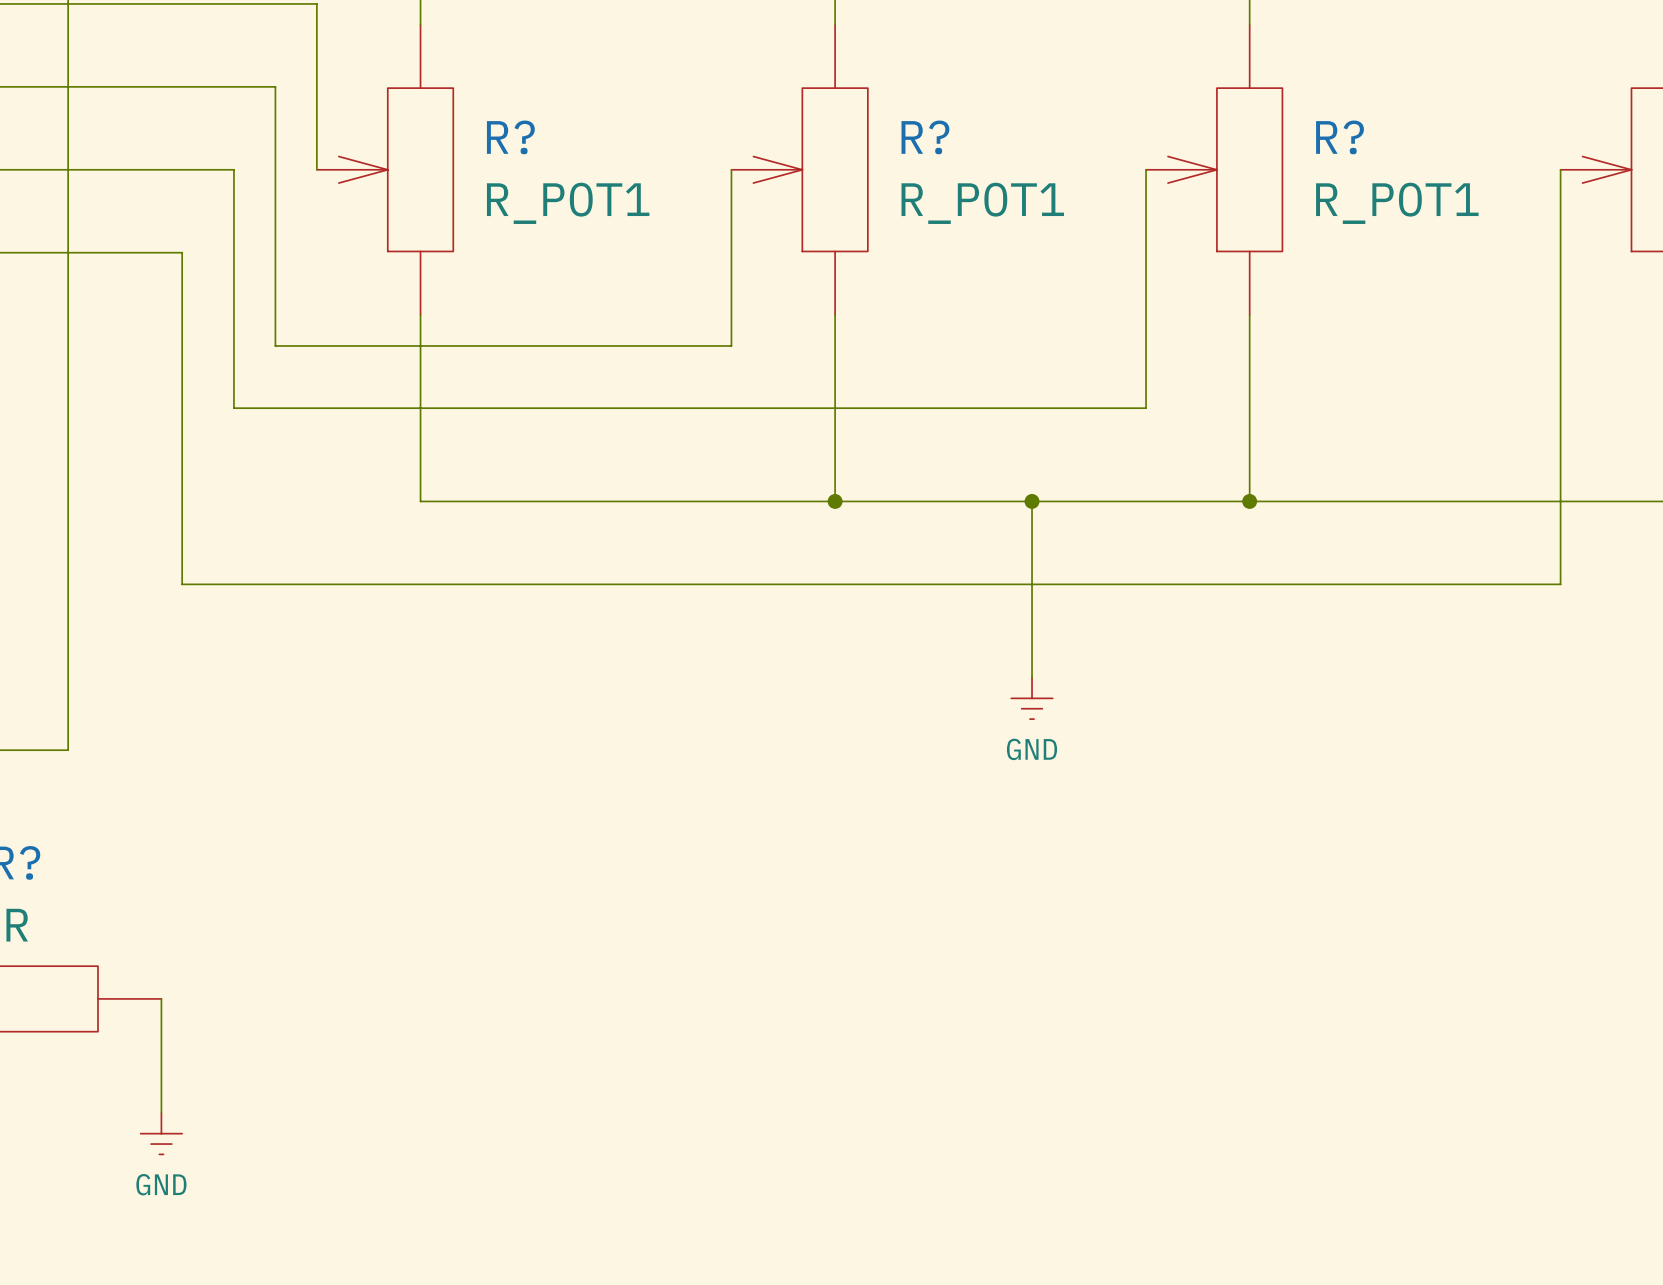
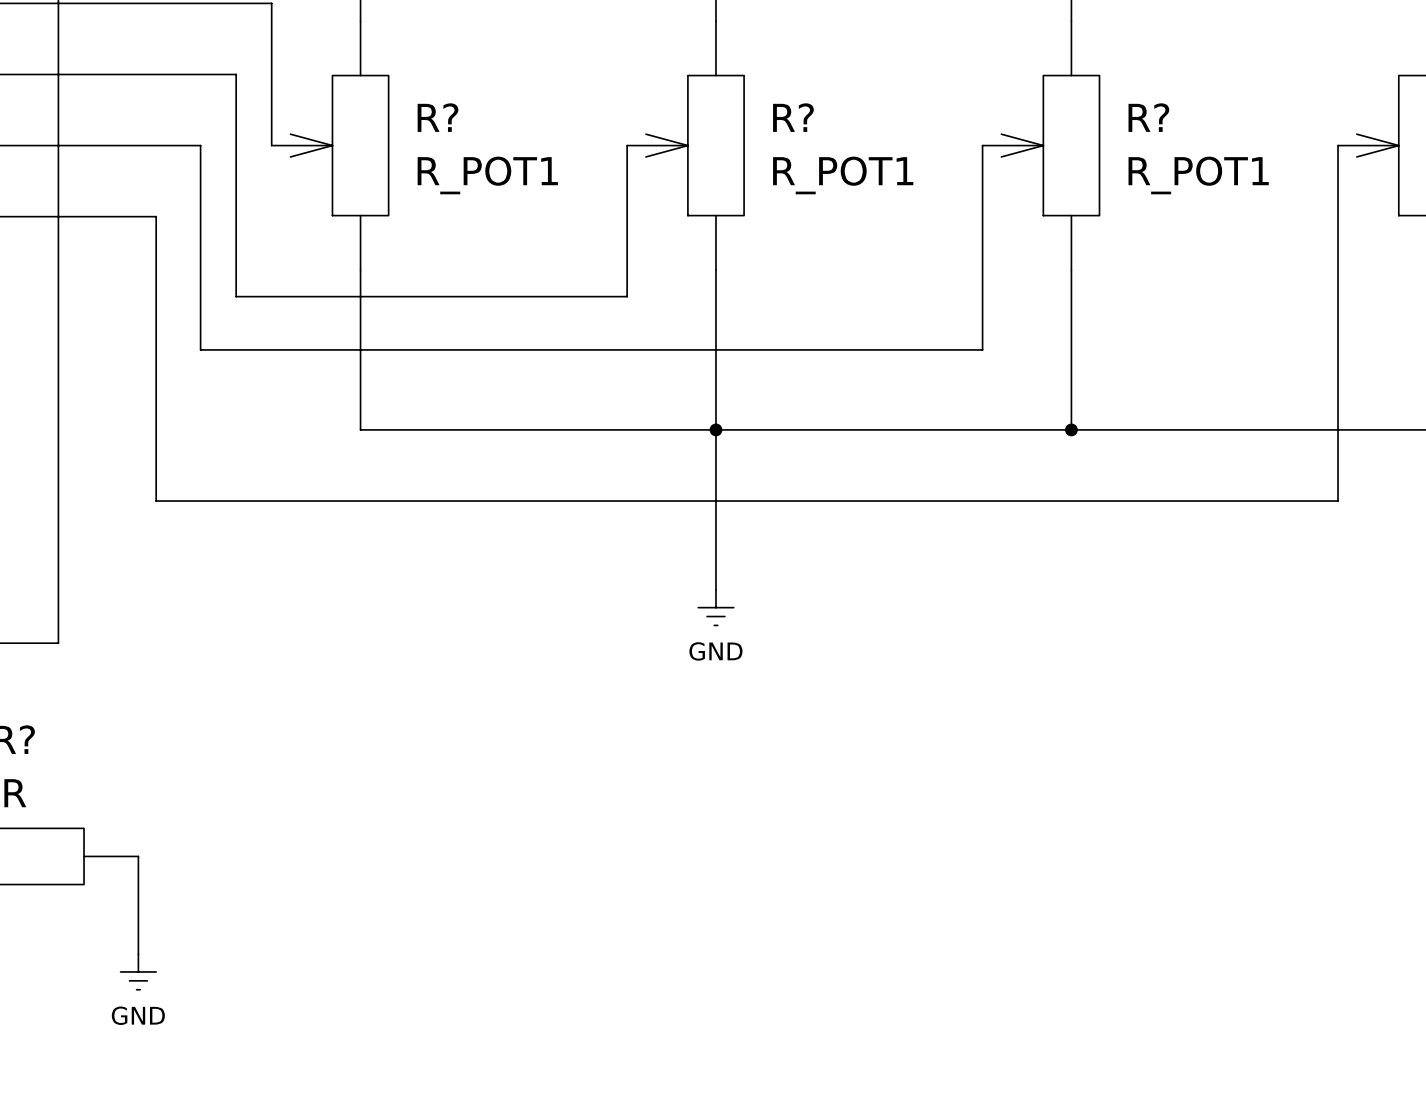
wire: none -> (715, 429) (715, 589)
wire: (1032, 501) (1032, 677) -> none
junction: (1032, 501) -> none
power symbol position: GND (1032, 698) -> GND (715, 607)

